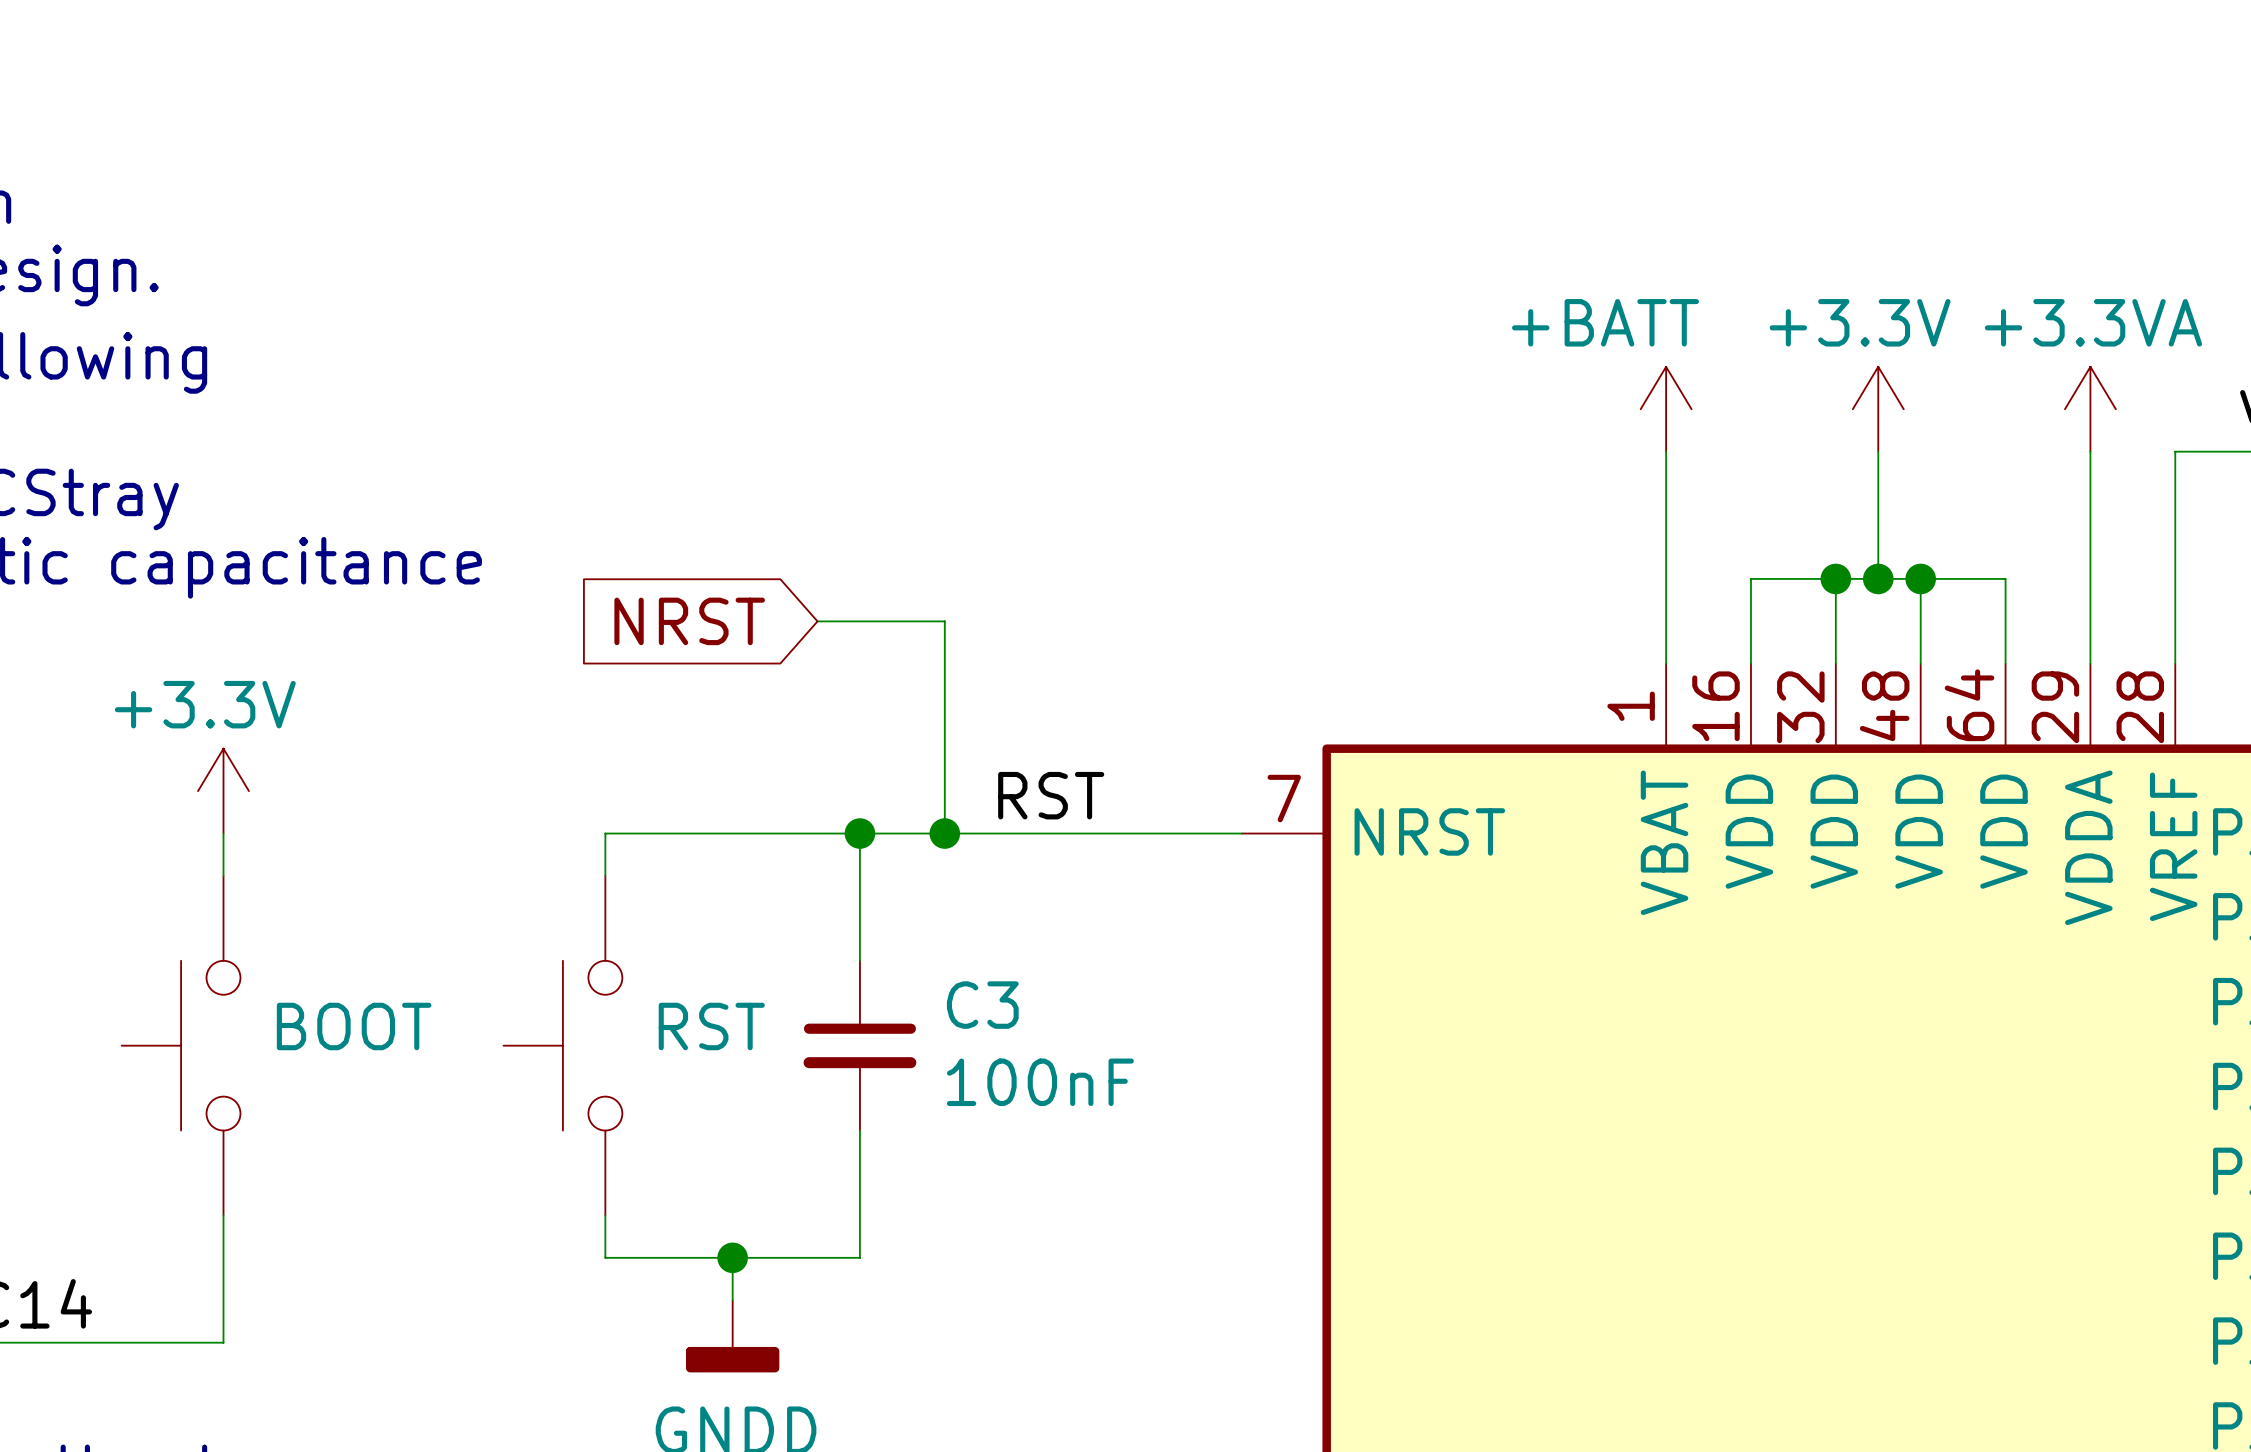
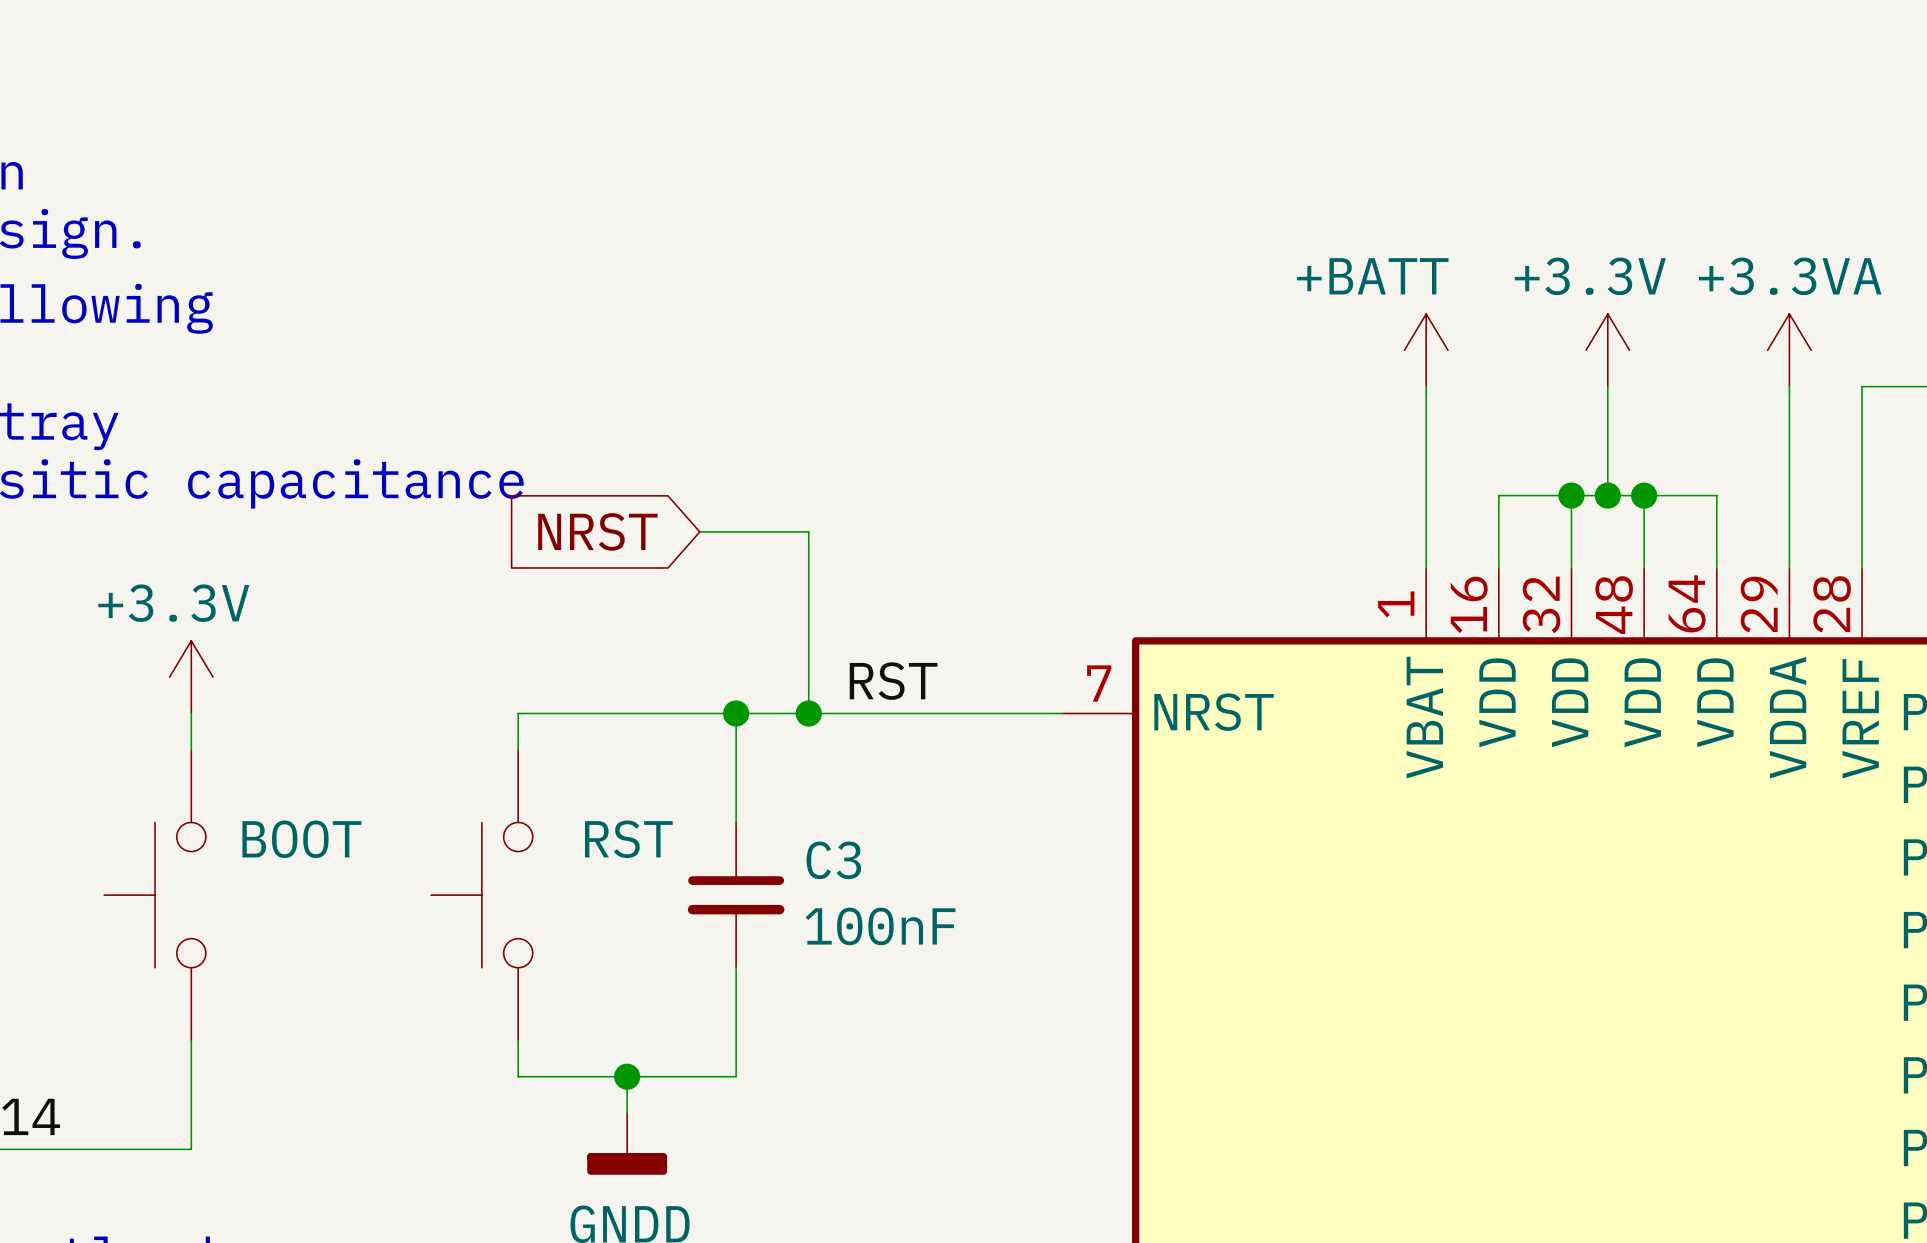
part text position: BOOT (354, 1026) -> BOOT (301, 839)
part text position: RST (711, 1026) -> RST (628, 839)

